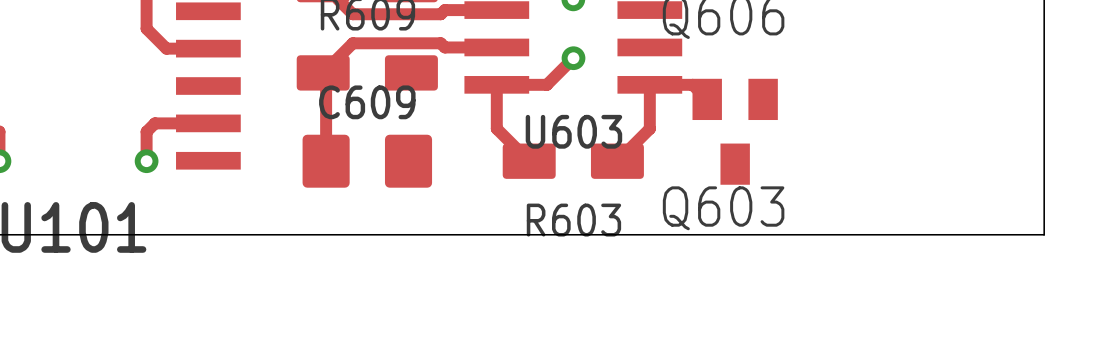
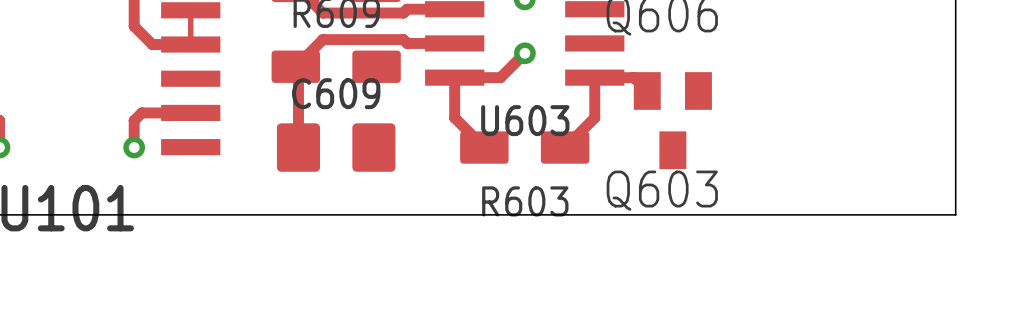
track: none -> (190, 10) (190, 44)

